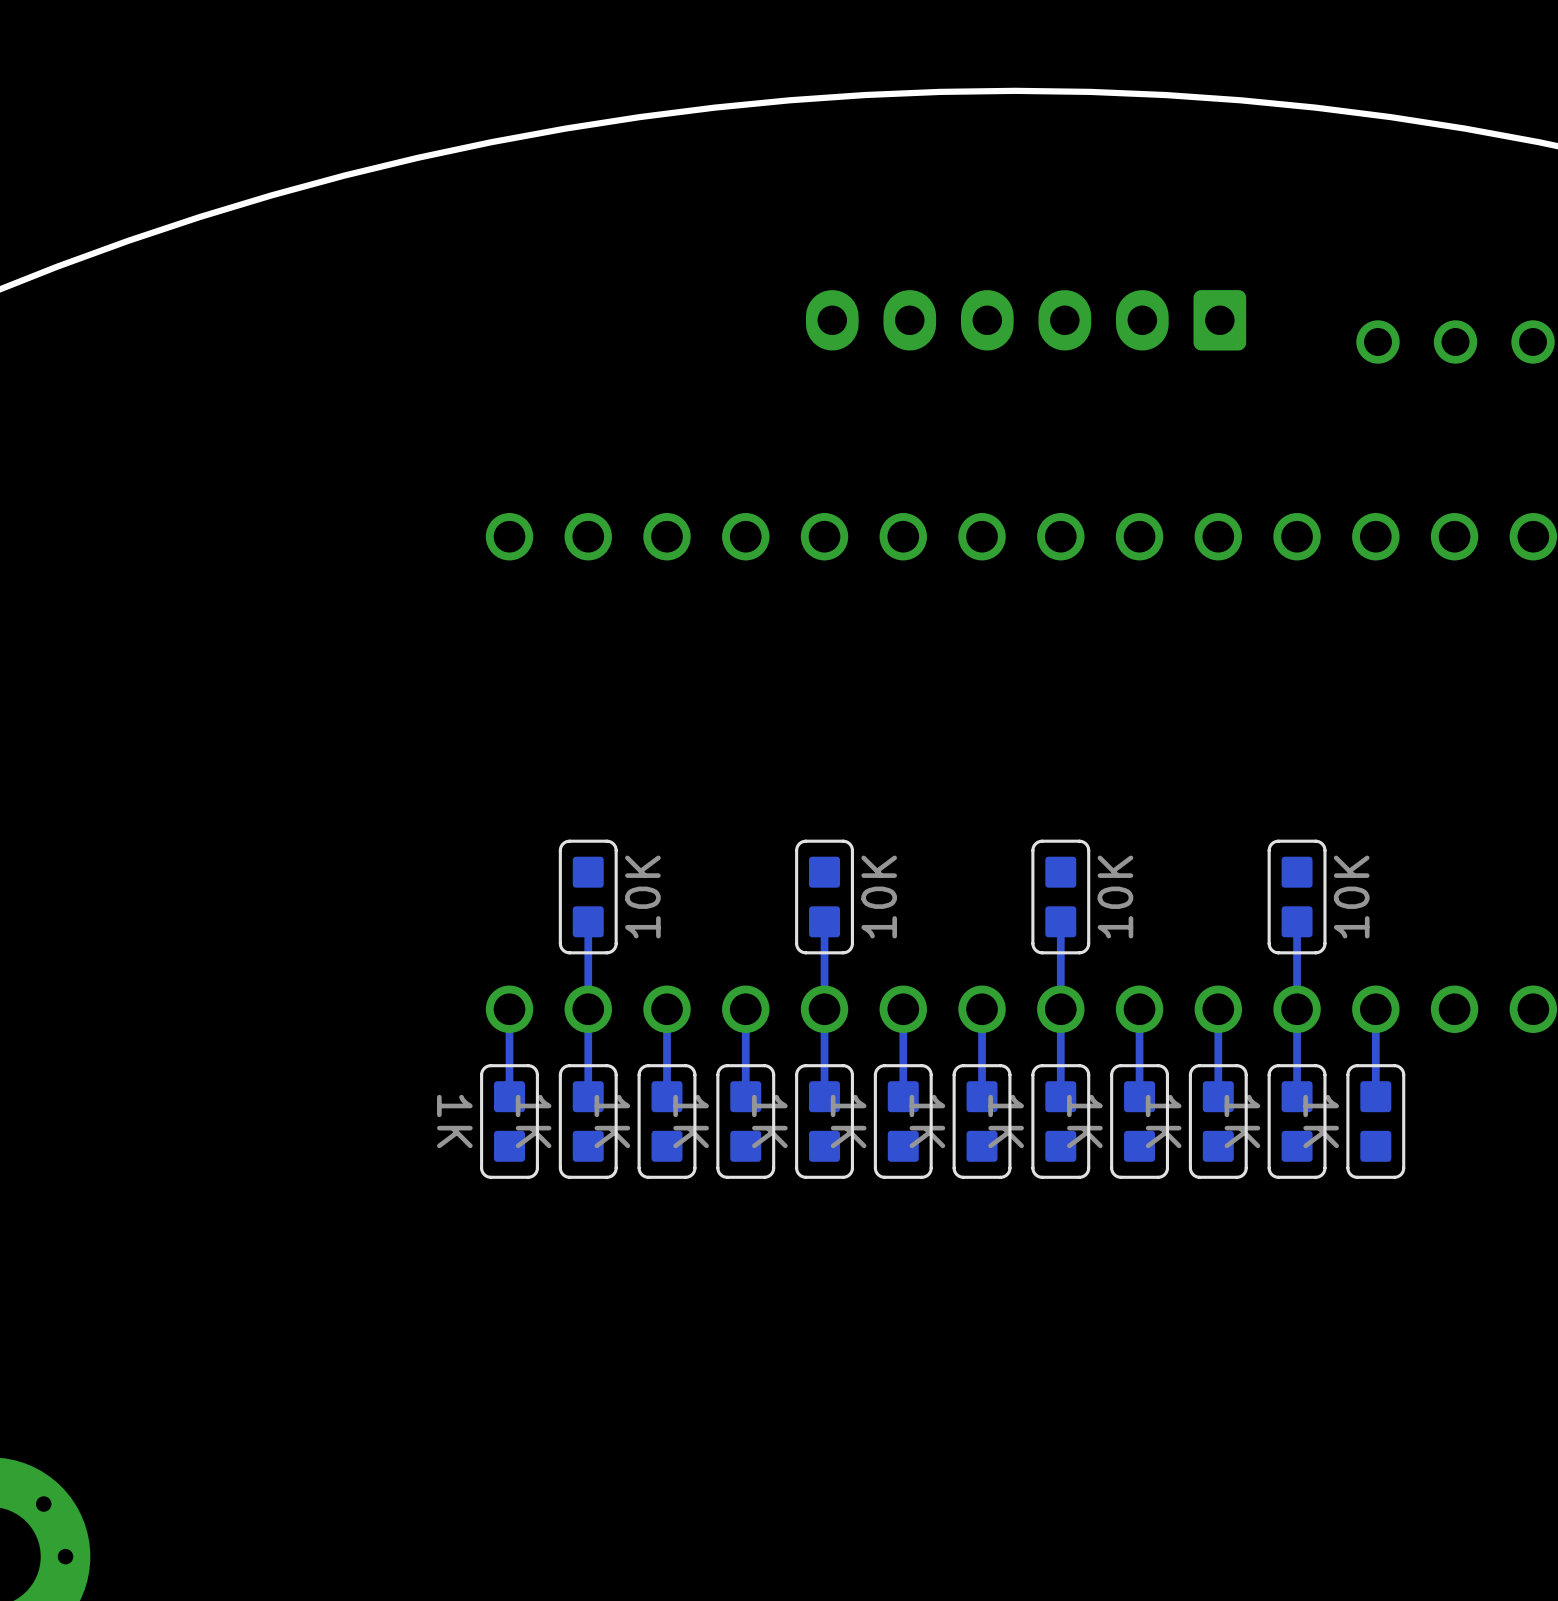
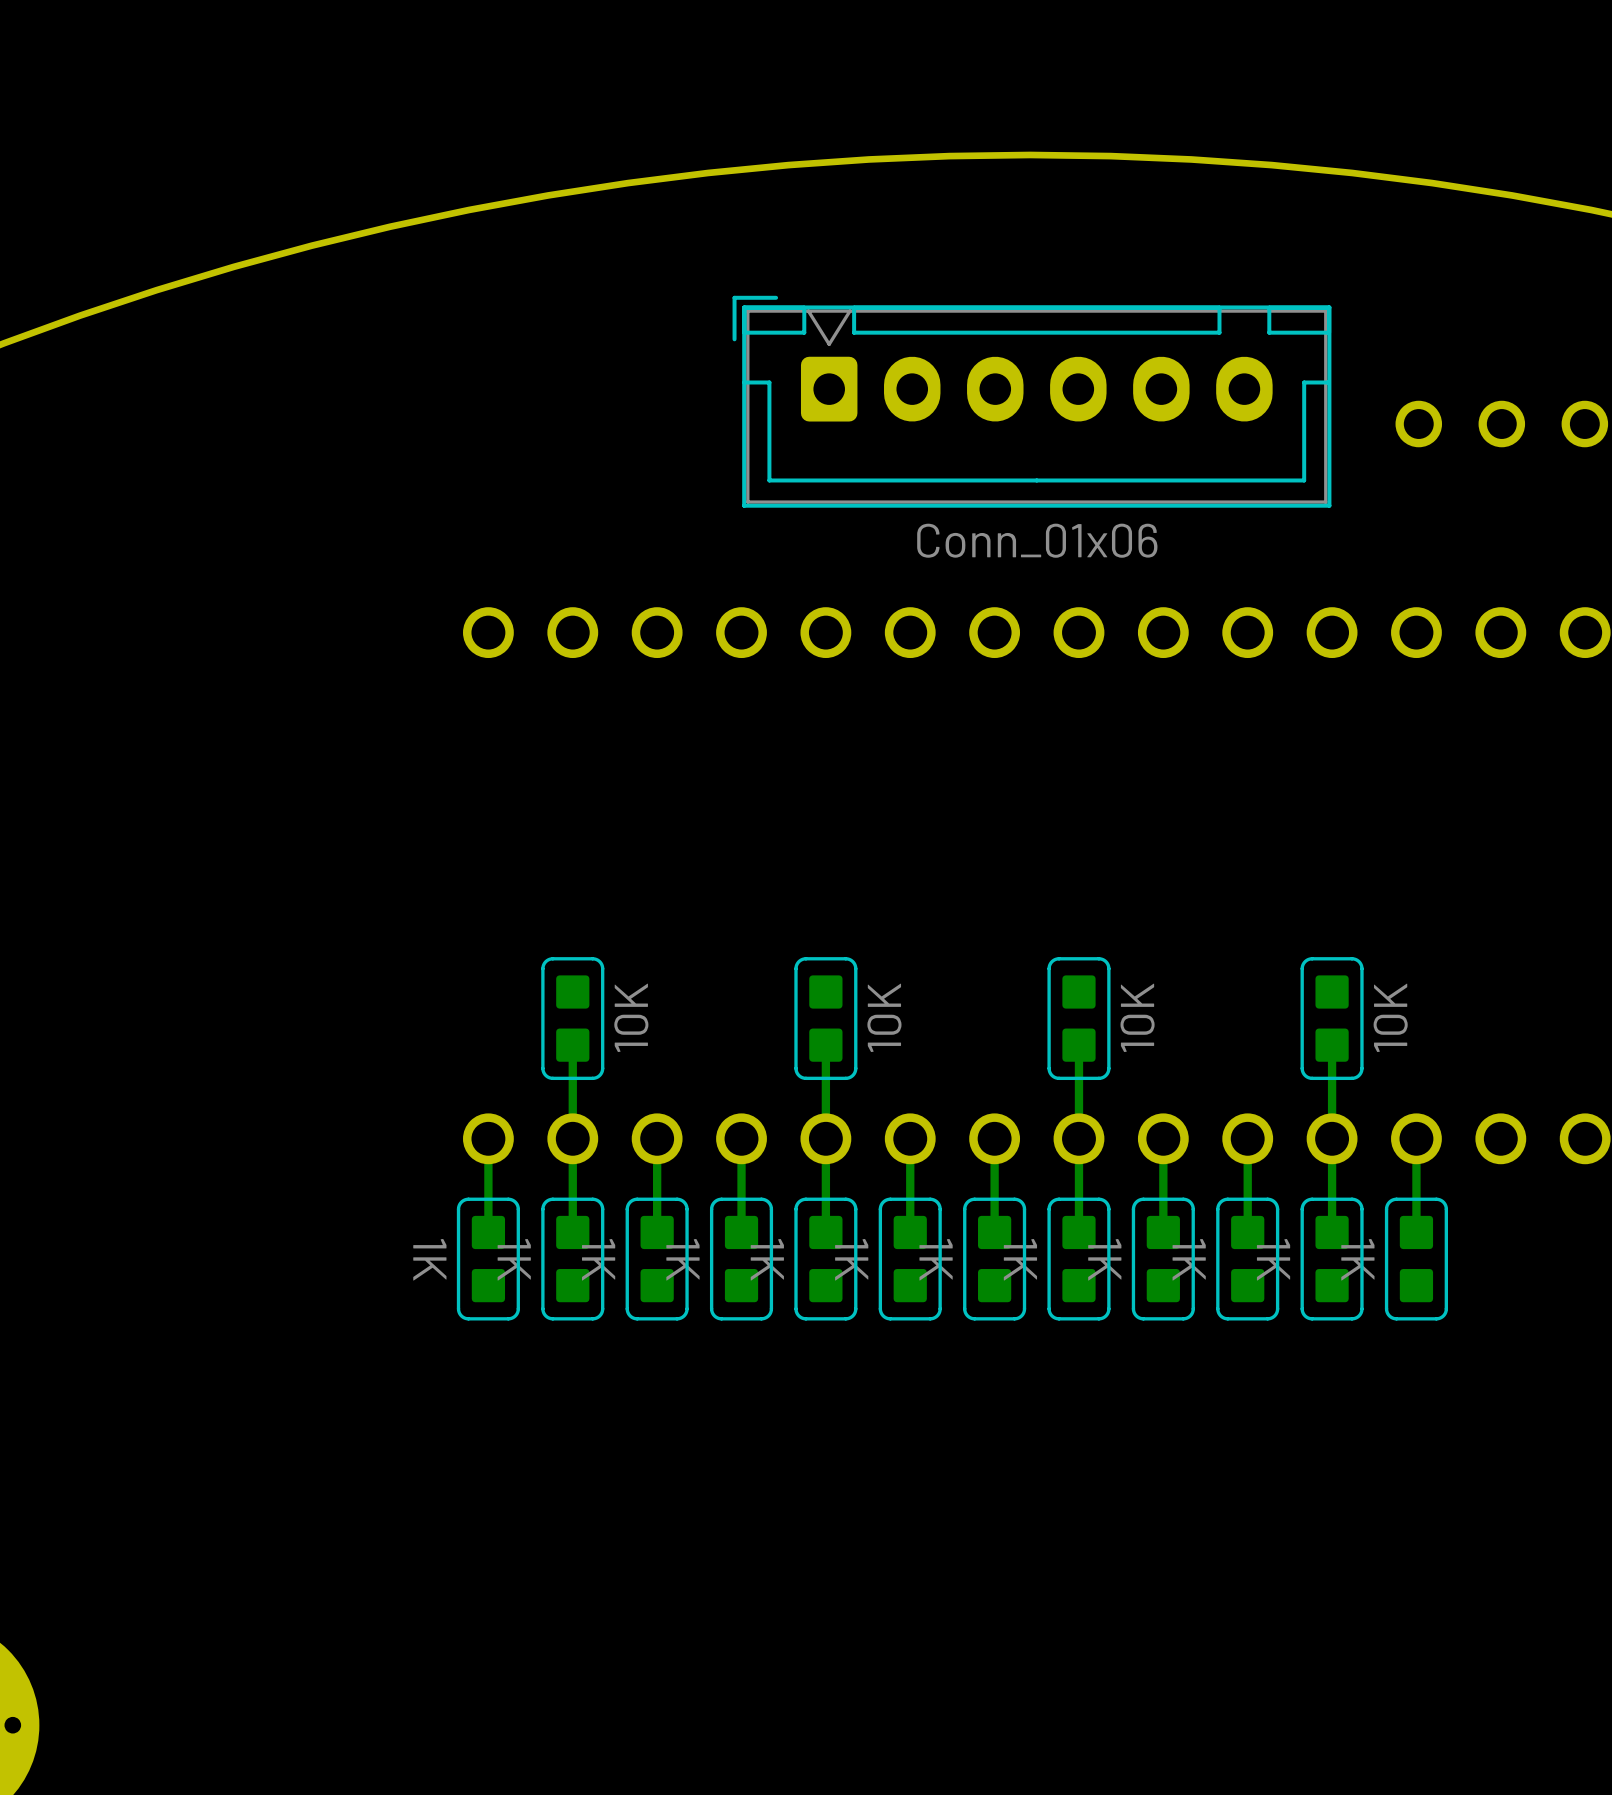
part side: top (1026, 320) -> bottom (1031, 401)

